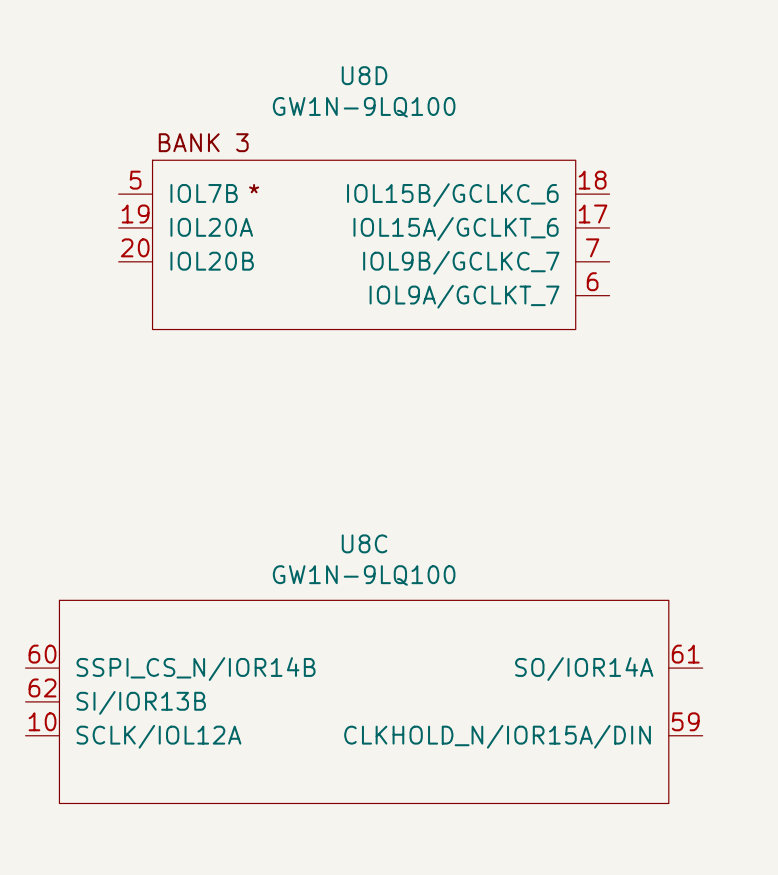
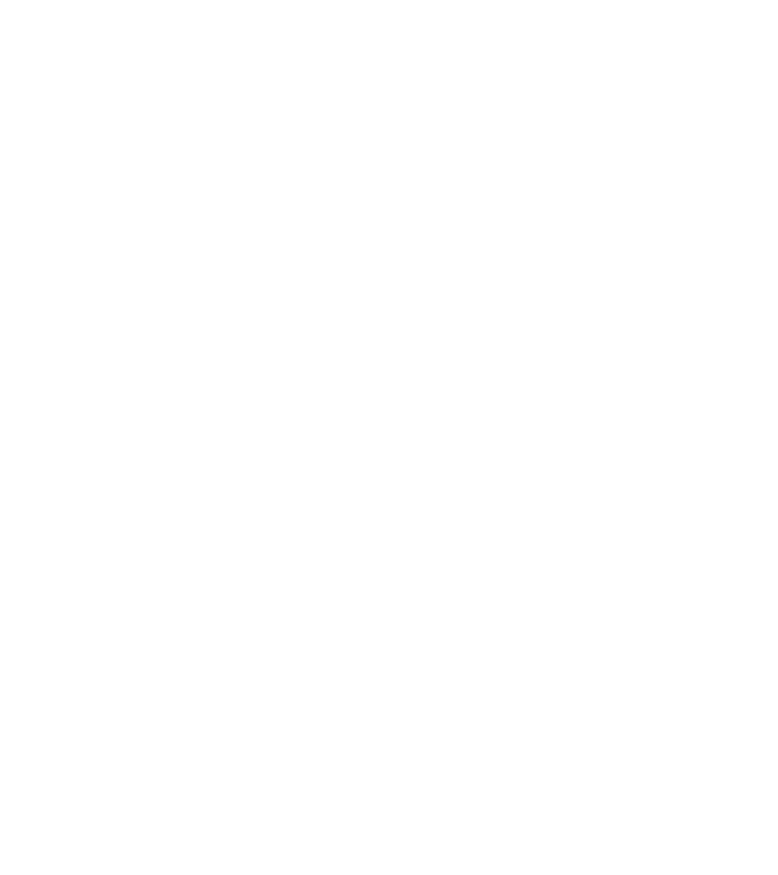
U8D: GW1N-9LQ100 (364, 244) -> none
U8C: GW1N-9LQ100 (364, 701) -> none

